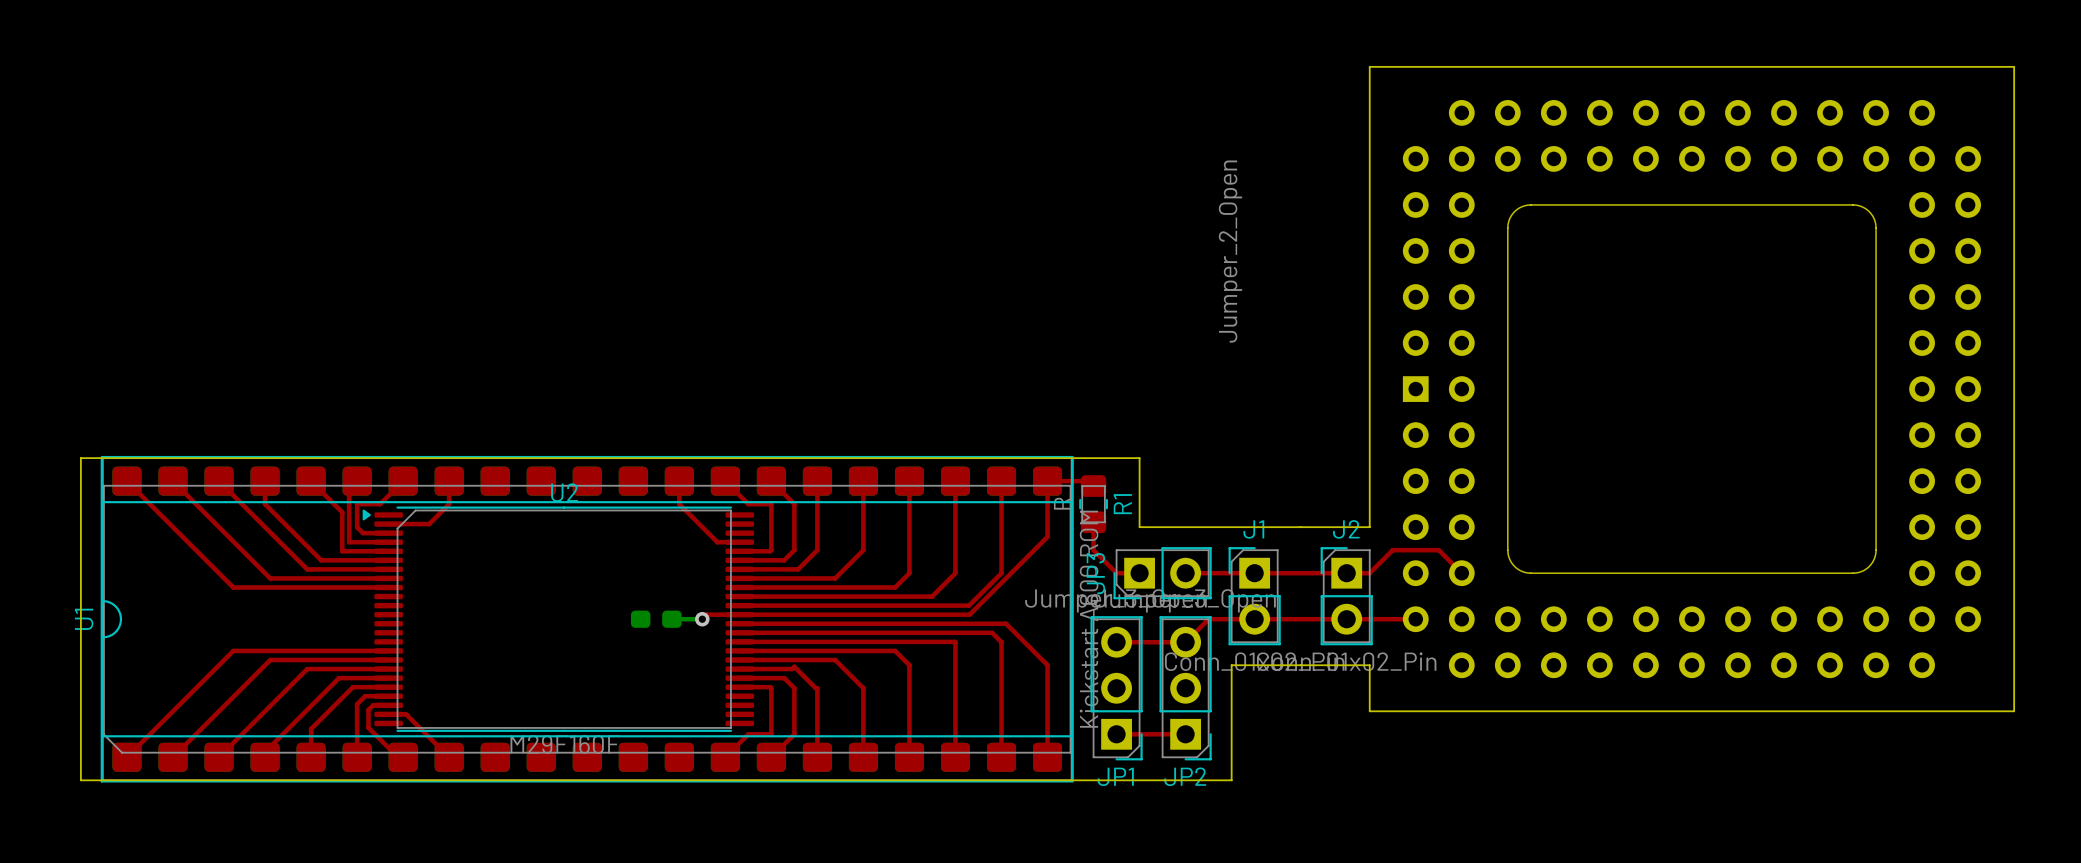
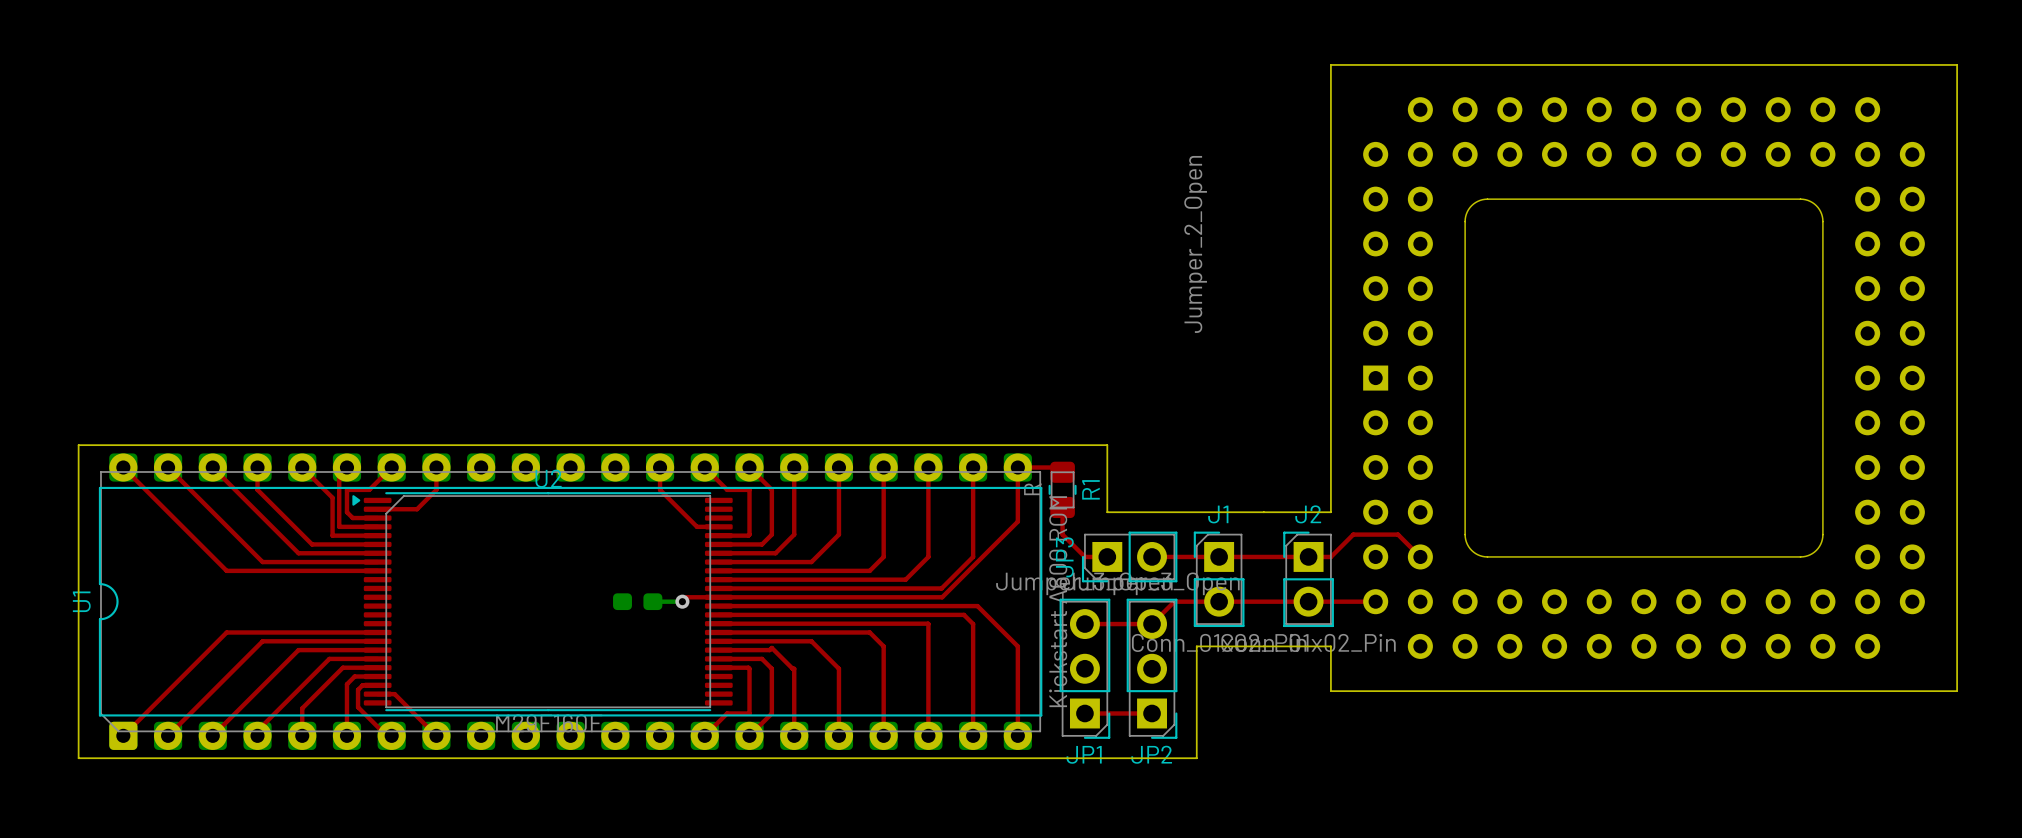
U1 footprint: [100, 455, 1074, 783] -> [98, 453, 1043, 750]

